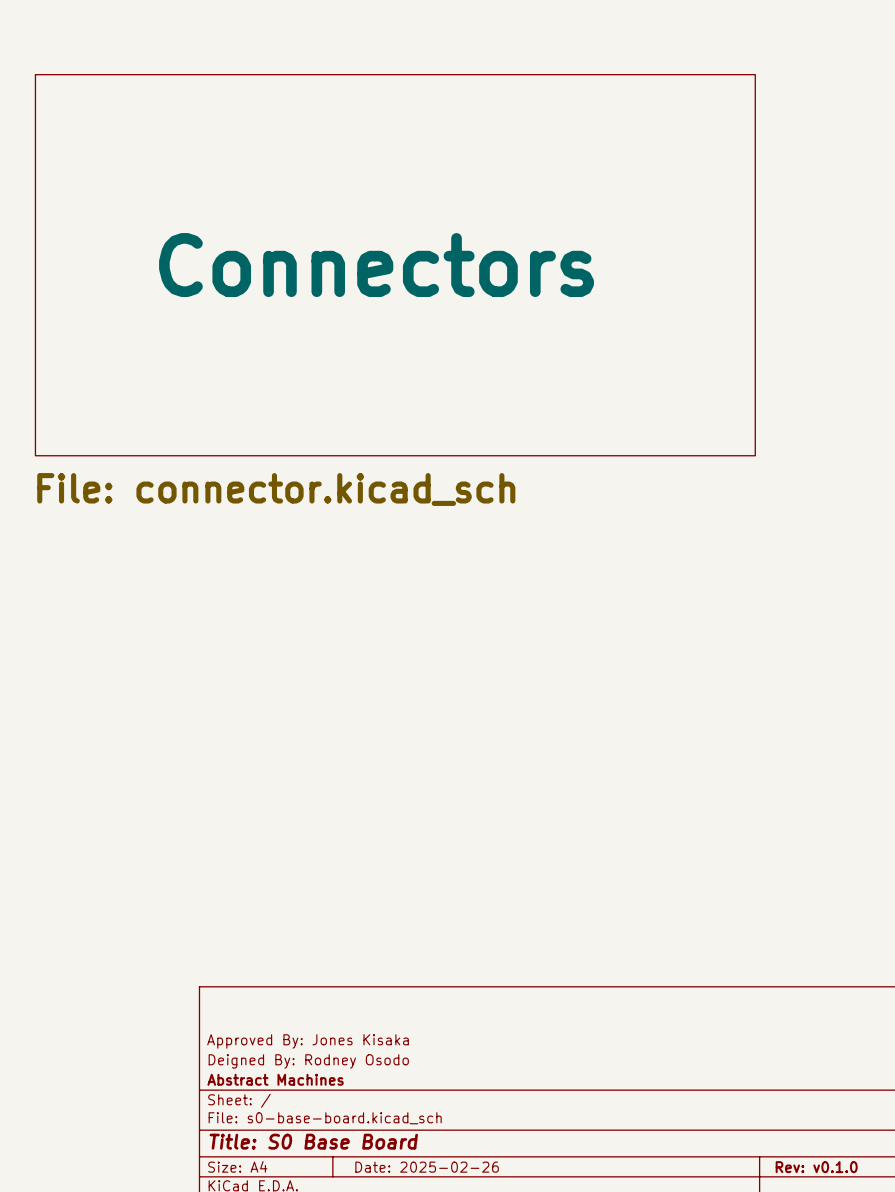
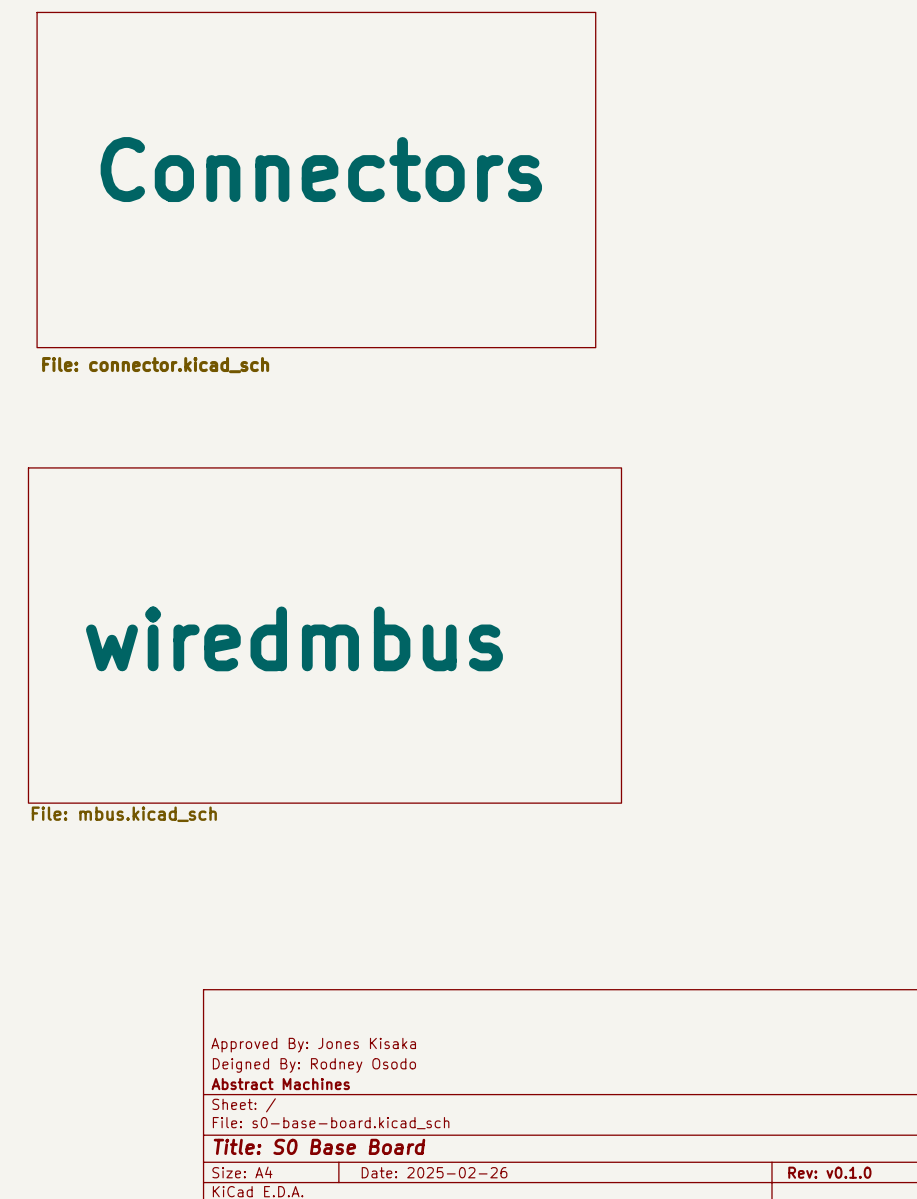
sheet Connectors: none -> File: connector.kicad_sch (316, 180)
sheet Connectors: File: connector.kicad_sch (395, 265) -> none
sheet wiredmbus: none -> File: mbus.kicad_sch (324, 635)

